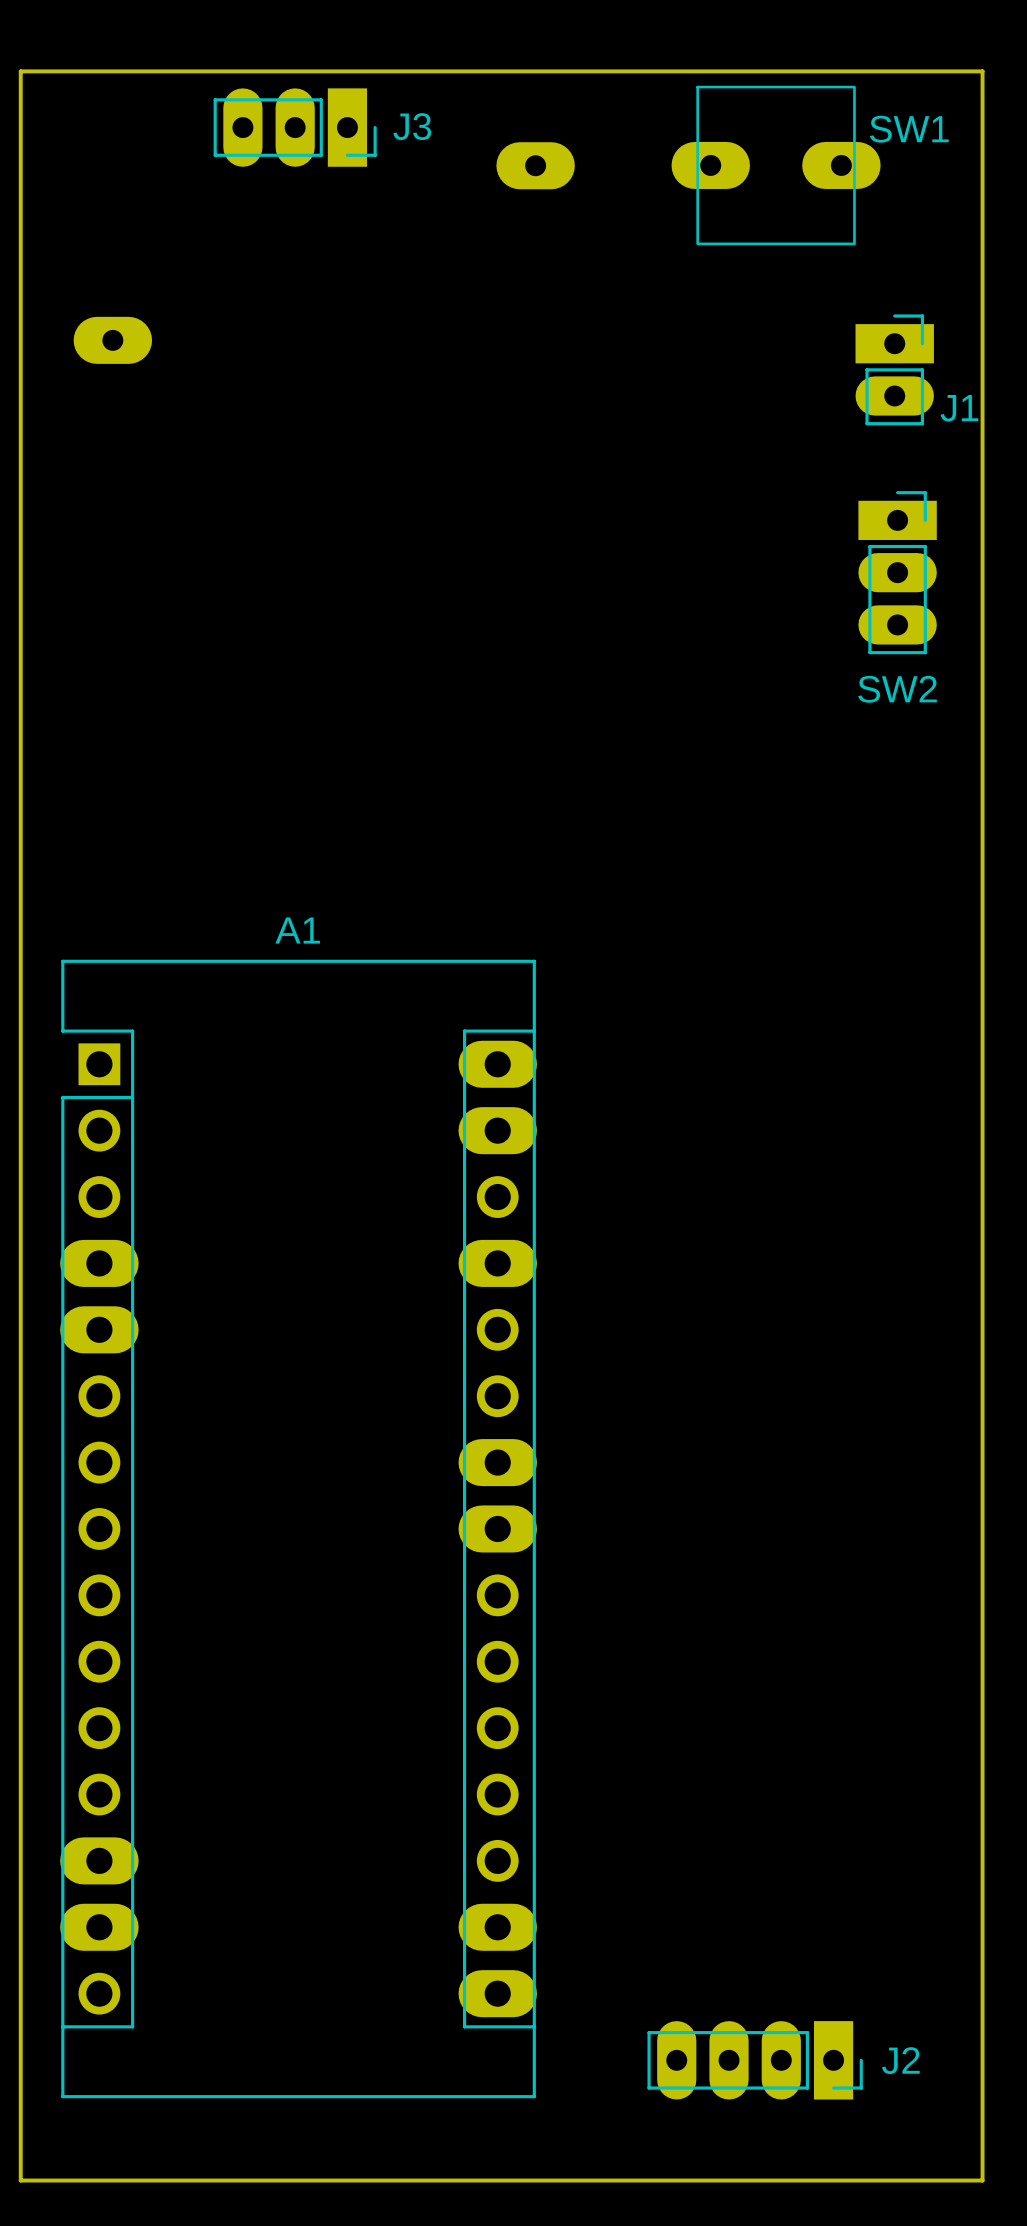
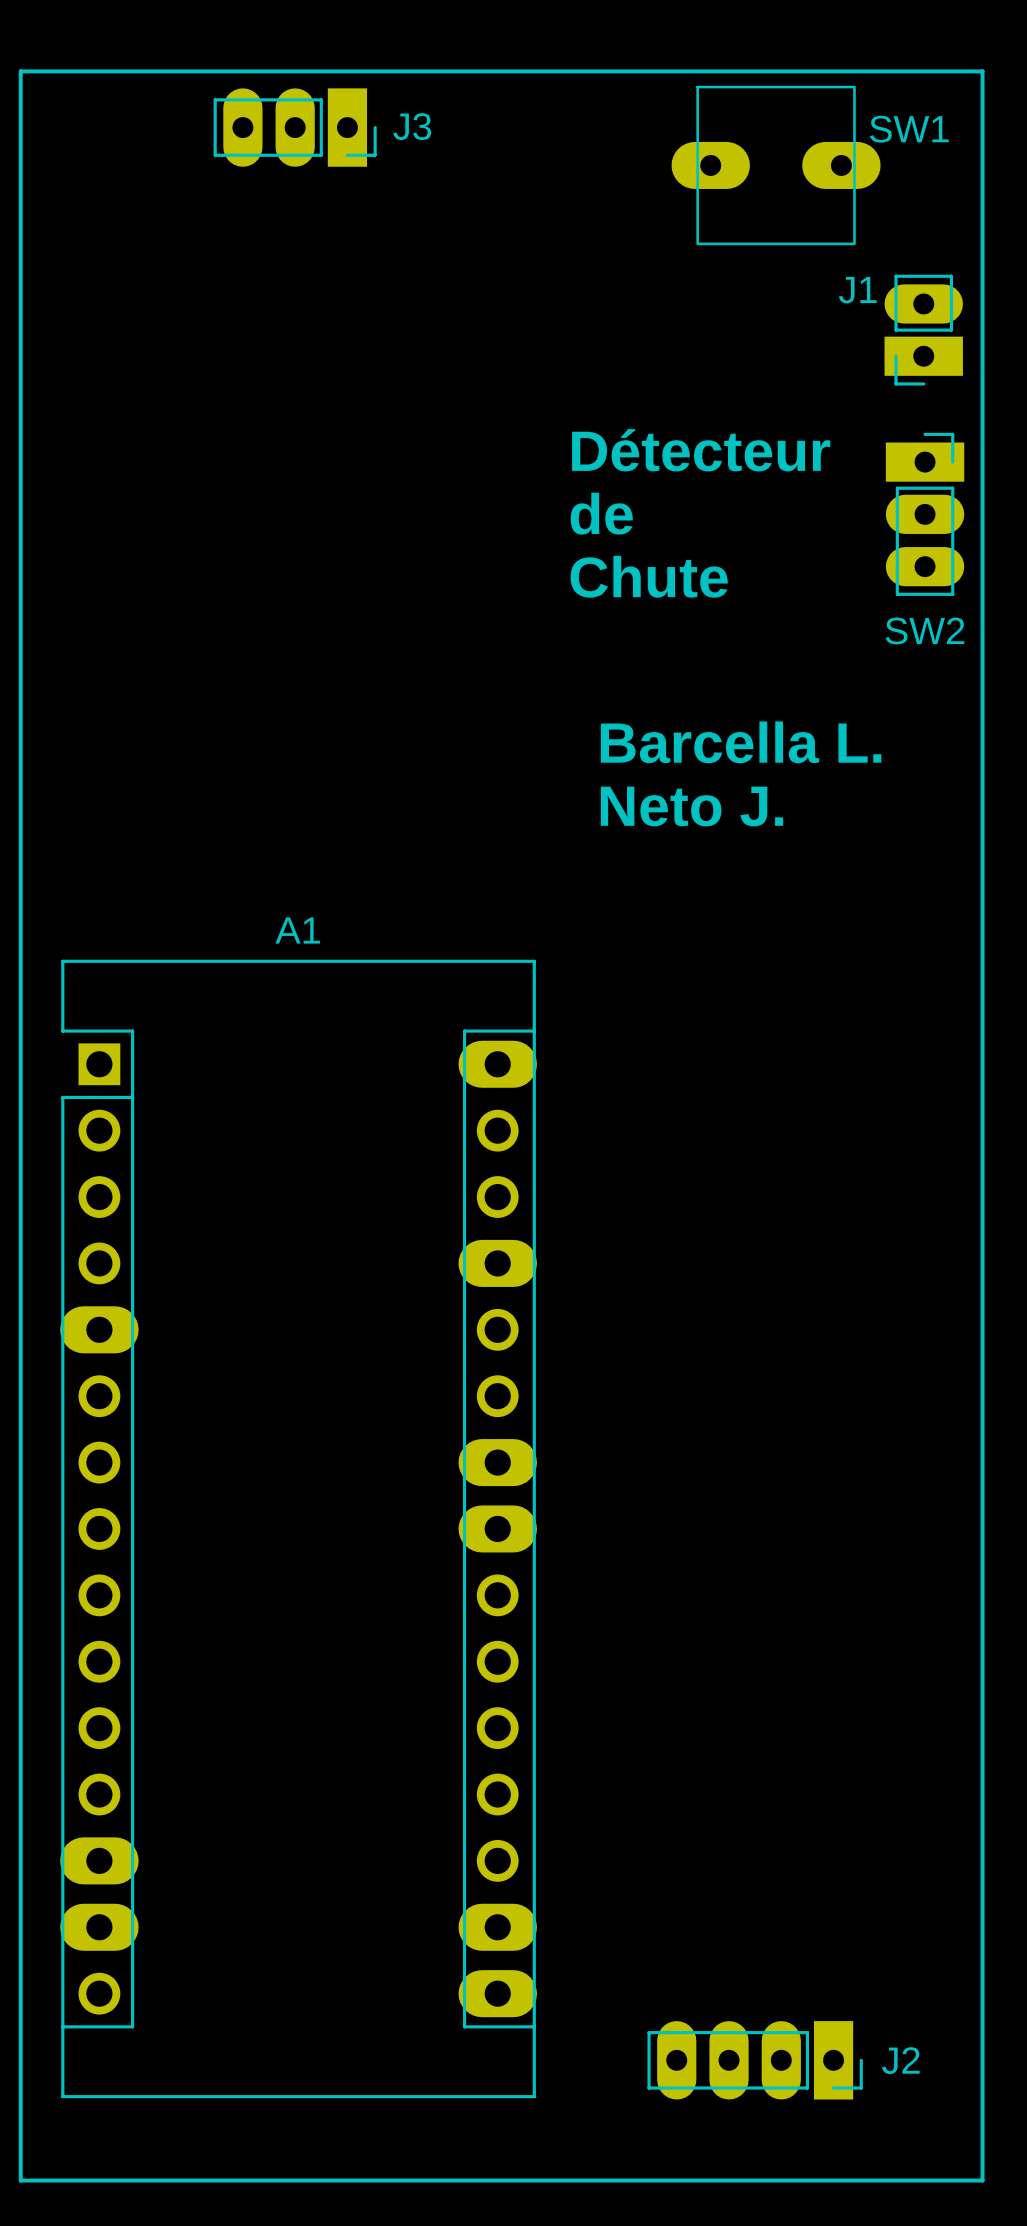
board edge: (20, 71) (982, 71) (982, 2180) (20, 2180) (20, 71) -> none
line: none -> (20, 71) (982, 71) (982, 2180) (20, 2180) (20, 71)
part: (535, 165) -> none
part: (112, 340) -> none
J1 rotation: 0° (894, 369) -> 180° (923, 330)
text: none -> Détecteur (701, 450)
text: none -> de (601, 513)
SW2 position: (897, 572) -> (925, 514)
text: none -> Chute (649, 576)
text: none -> Barcella L. (741, 742)
text: none -> Neto J. (691, 806)
A1 footprint: [60, 959, 537, 2099] -> [60, 959, 537, 2099]

